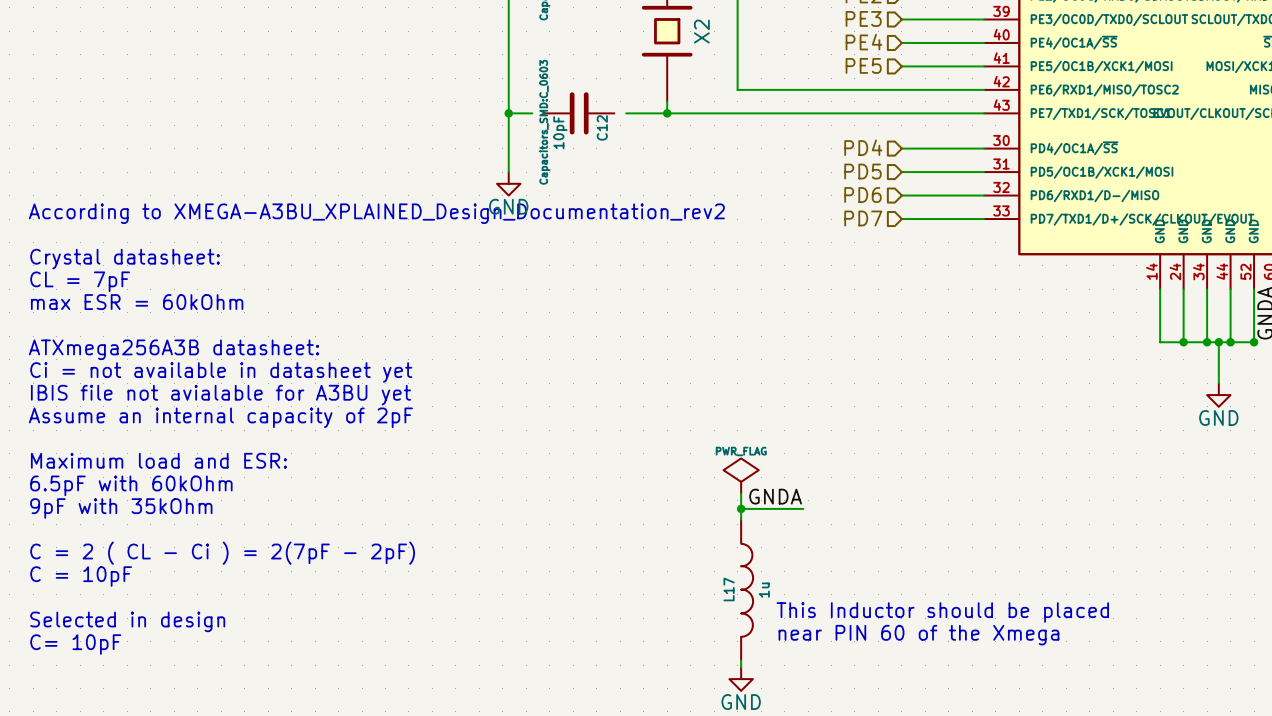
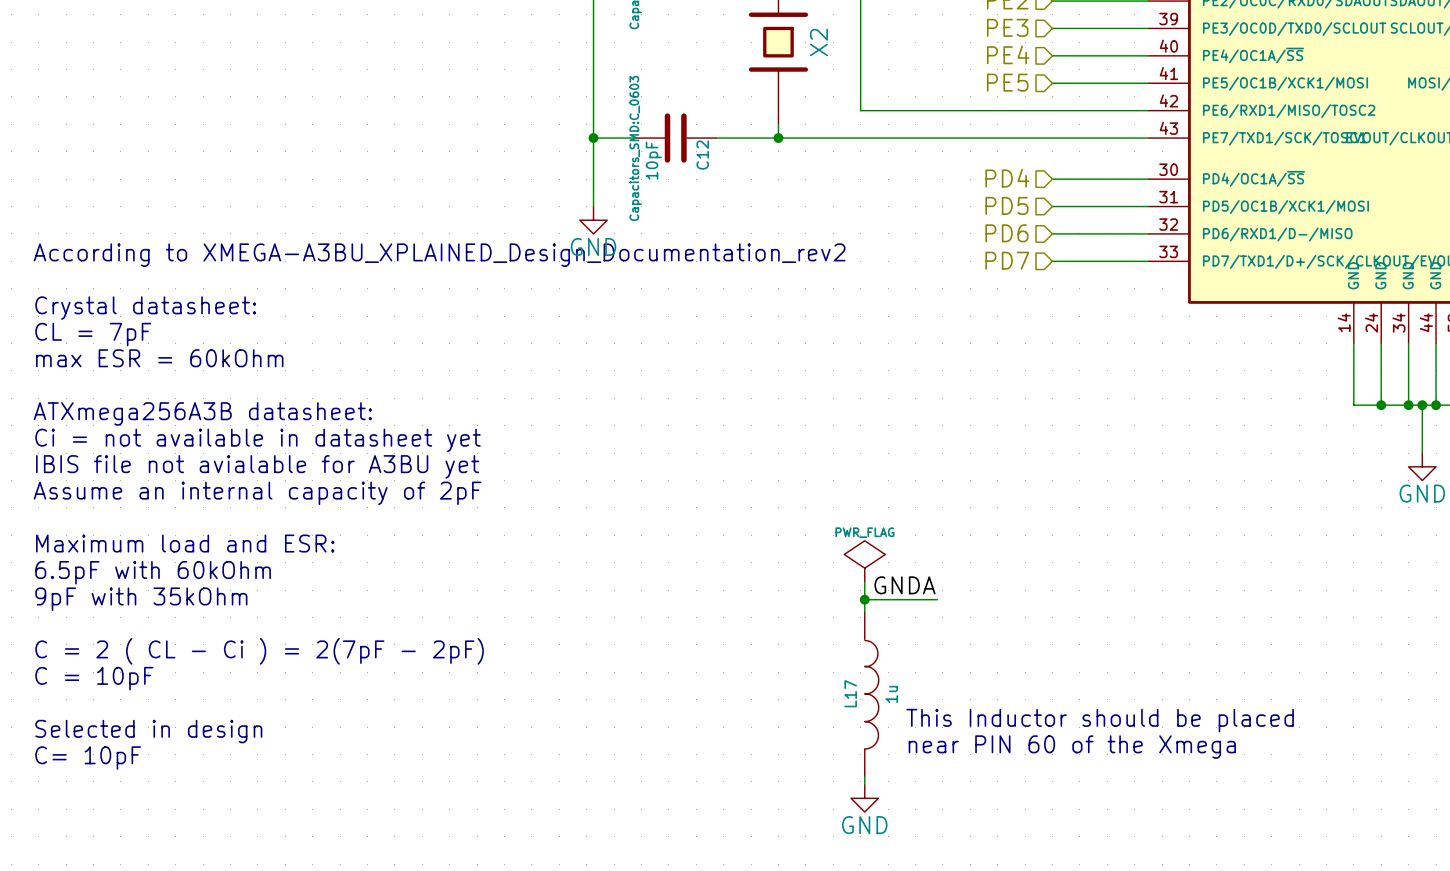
wire: none -> (620, 138) (634, 138)
wire: none -> (716, 138) (730, 138)

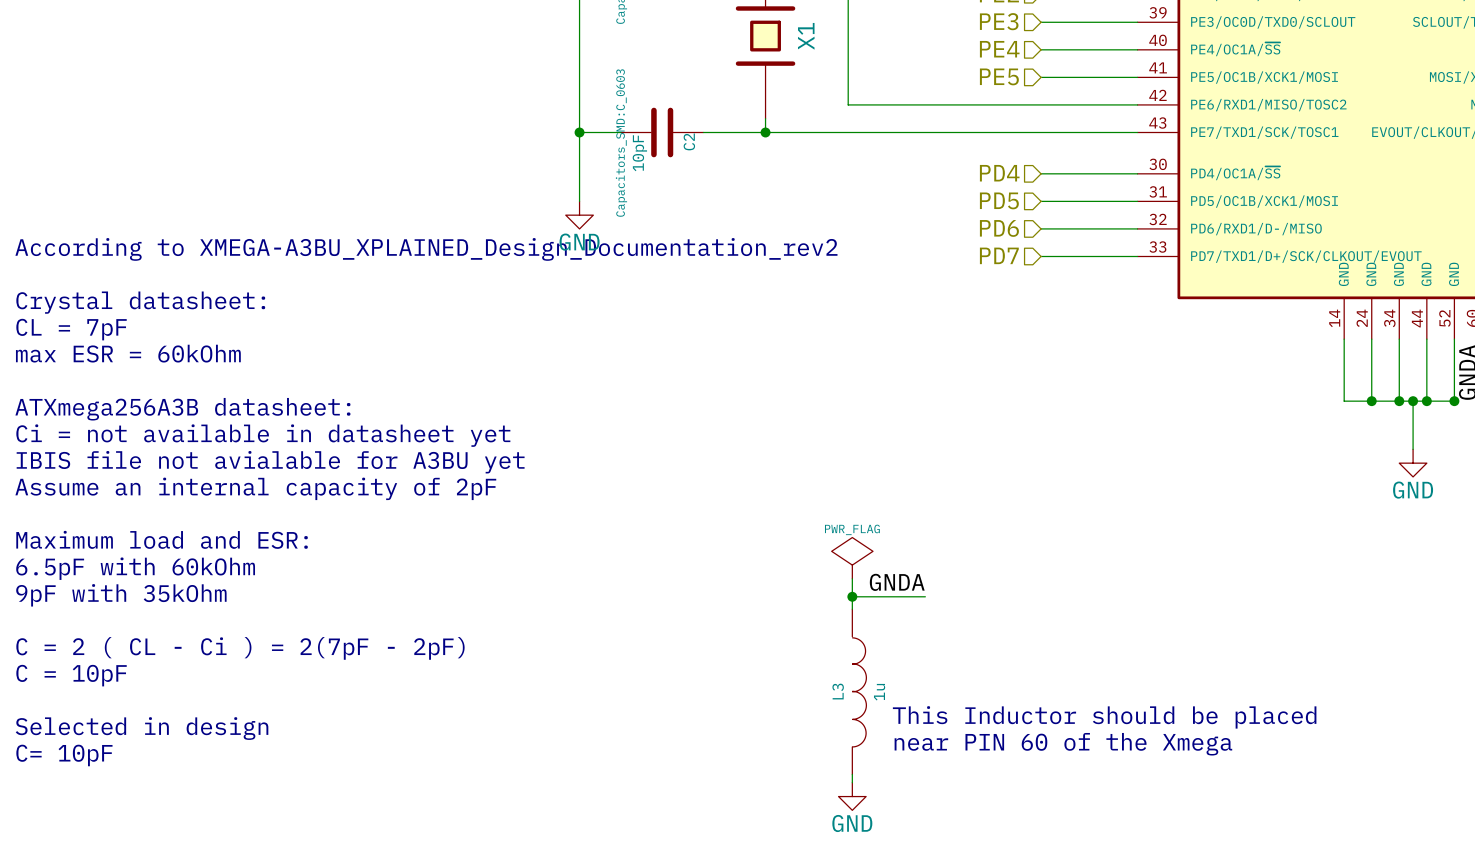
X2 name: X2 (818, 42) -> X1 (806, 36)
C12 name: C12 (702, 155) -> C2 (689, 141)
L17 name: L17 (850, 693) -> L3 (838, 691)

